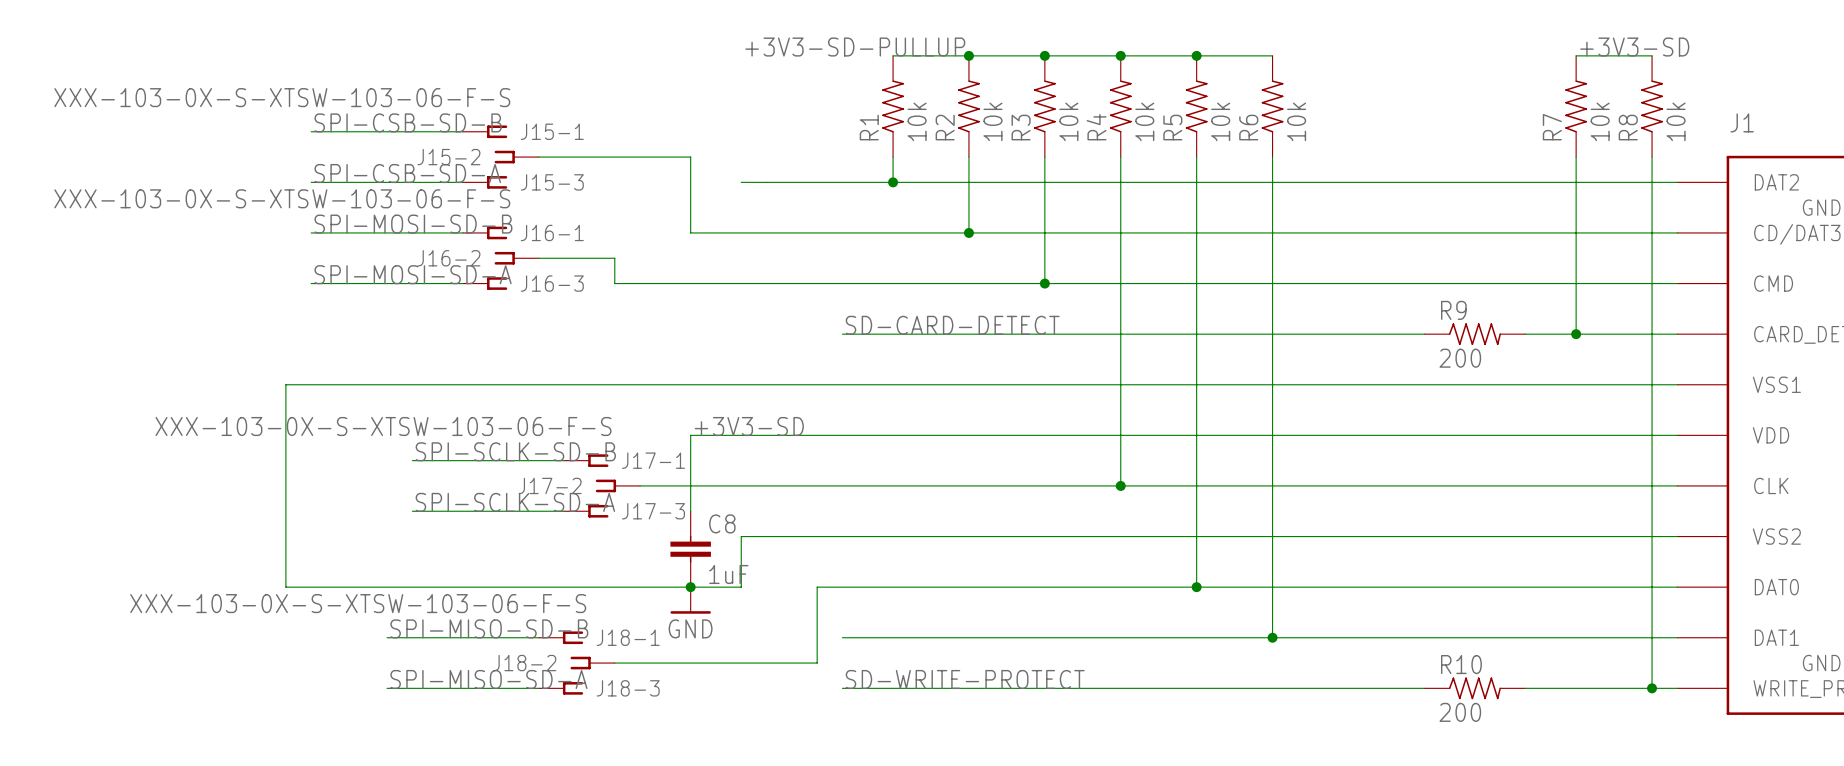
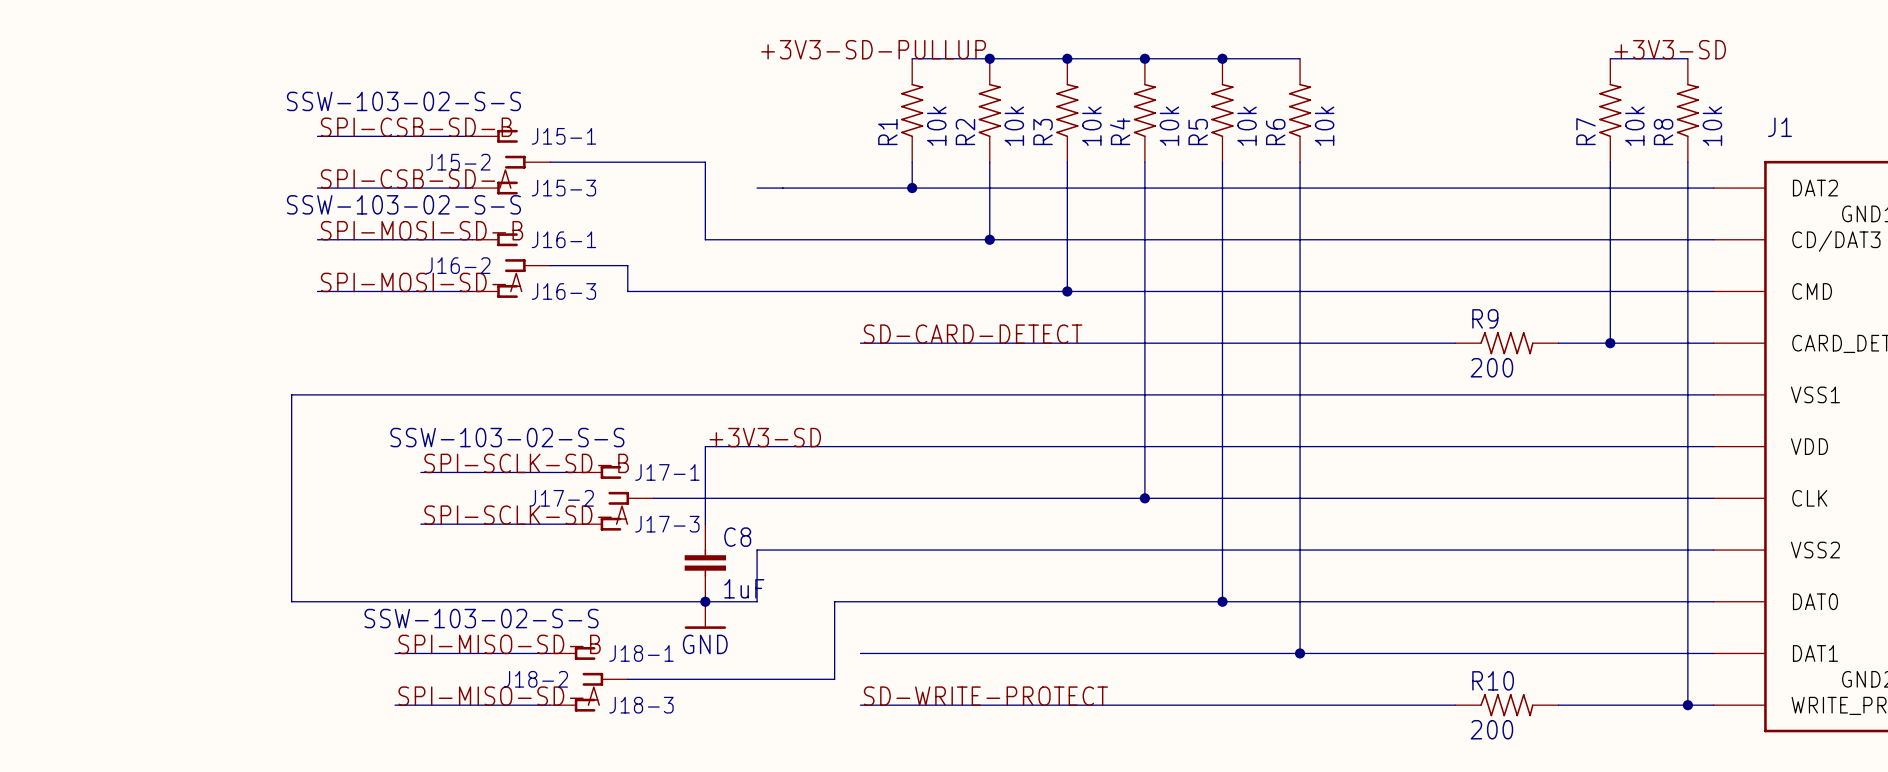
J15-1 value: XXX-103-0X-S-XTSW-103-06-F-S (282, 97) -> SSW-103-02-S-S (403, 101)
J16-1 value: XXX-103-0X-S-XTSW-103-06-F-S (282, 198) -> SSW-103-02-S-S (403, 204)
J17-1 value: XXX-103-0X-S-XTSW-103-06-F-S (383, 426) -> SSW-103-02-S-S (507, 437)
J18-1 value: XXX-103-0X-S-XTSW-103-06-F-S (358, 603) -> SSW-103-02-S-S (481, 618)

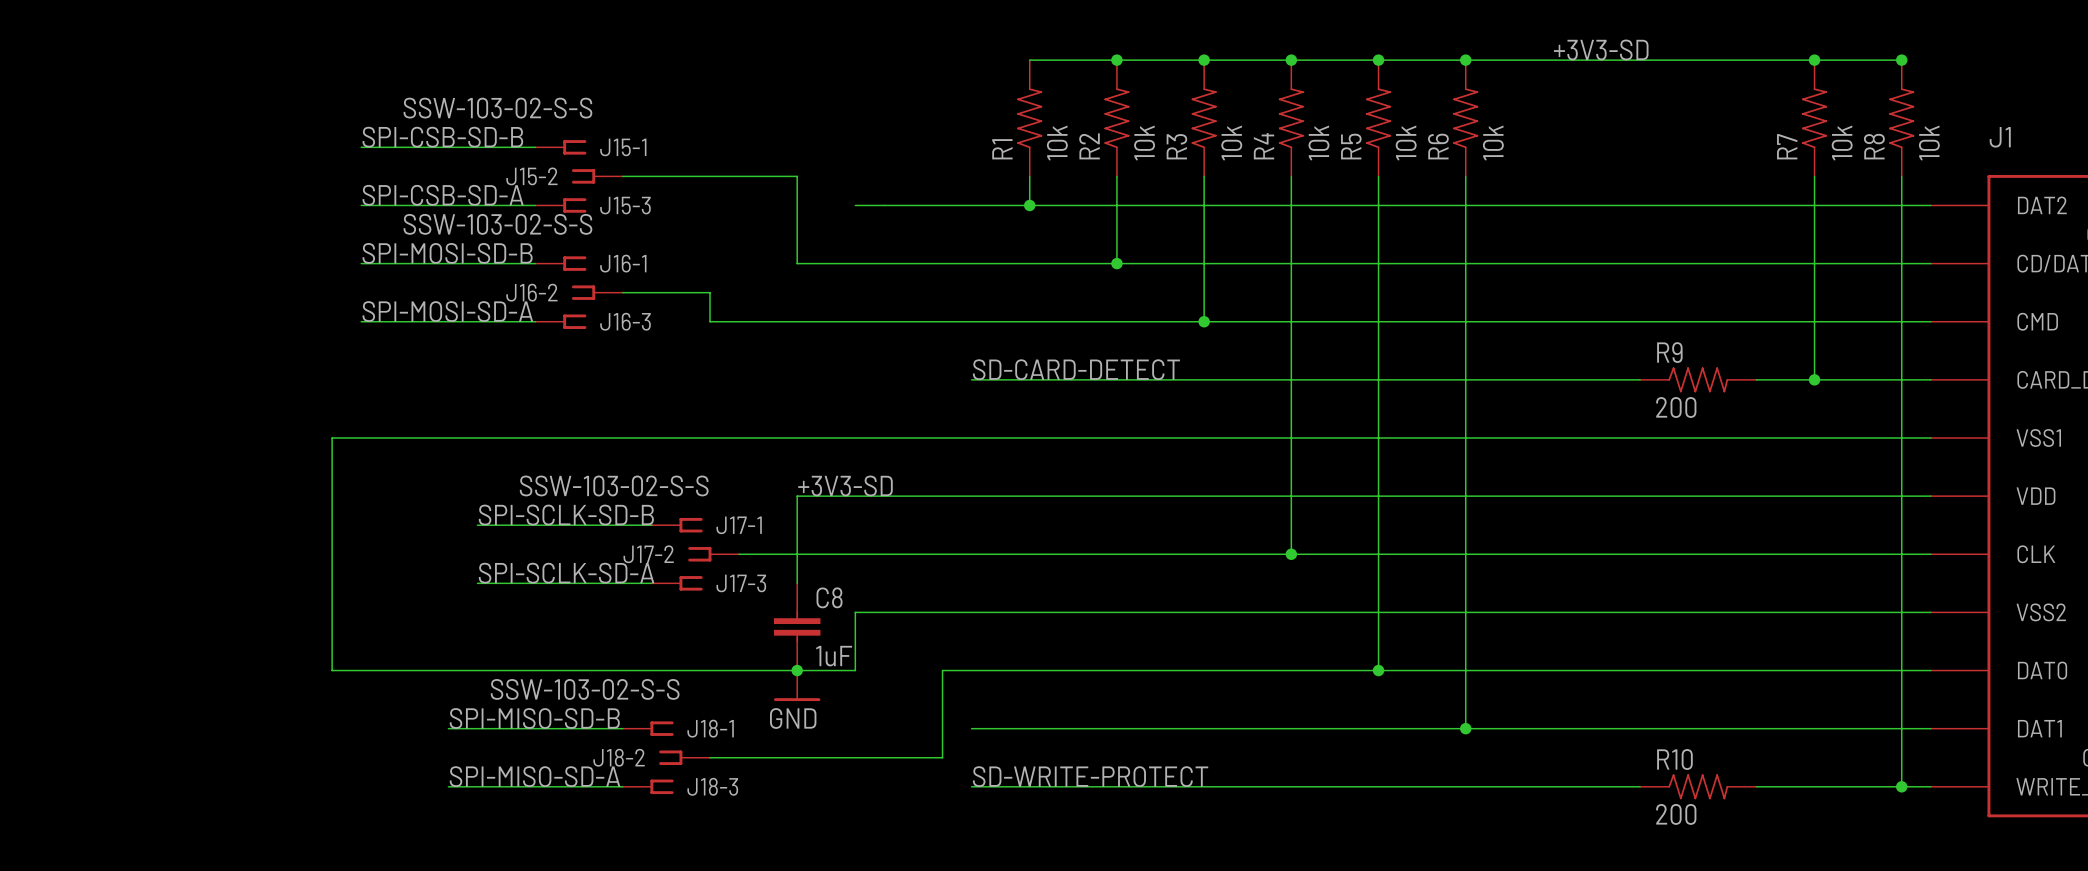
label: +3V3-SD-PULLUP (873, 49) -> none
label position: +3V3-SD (1670, 49) -> +3V3-SD (1601, 49)
wire: none -> (1465, 60) (1814, 60)
junction: none -> (1465, 60)
junction: none -> (1814, 60)
junction: none -> (1901, 60)

